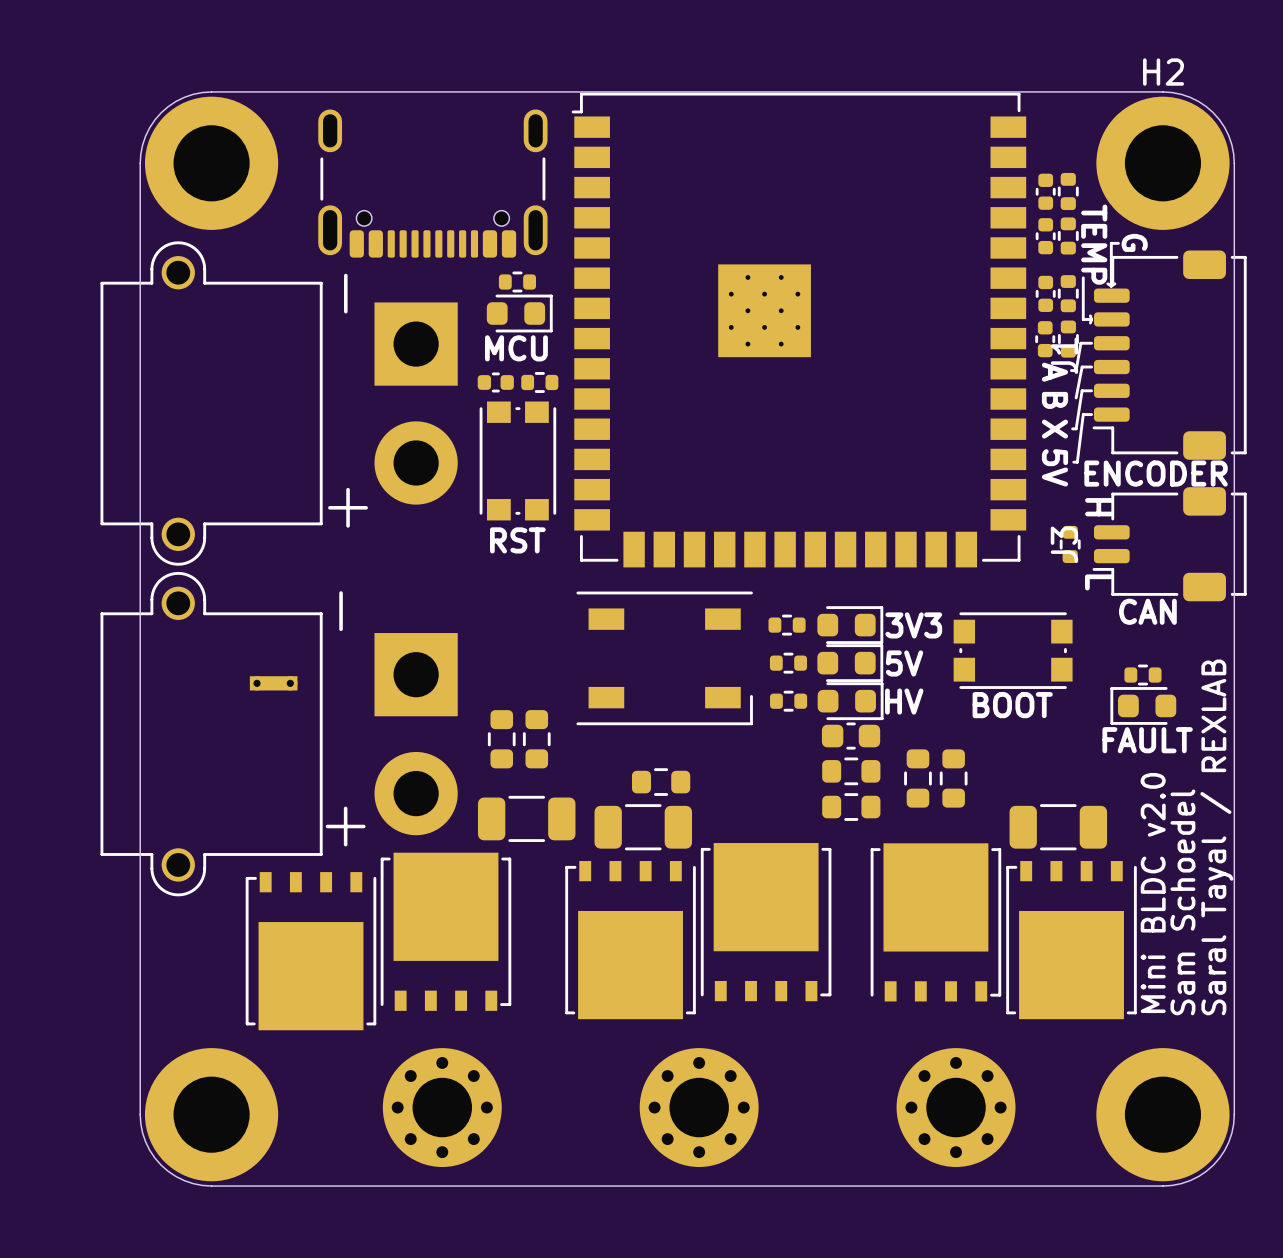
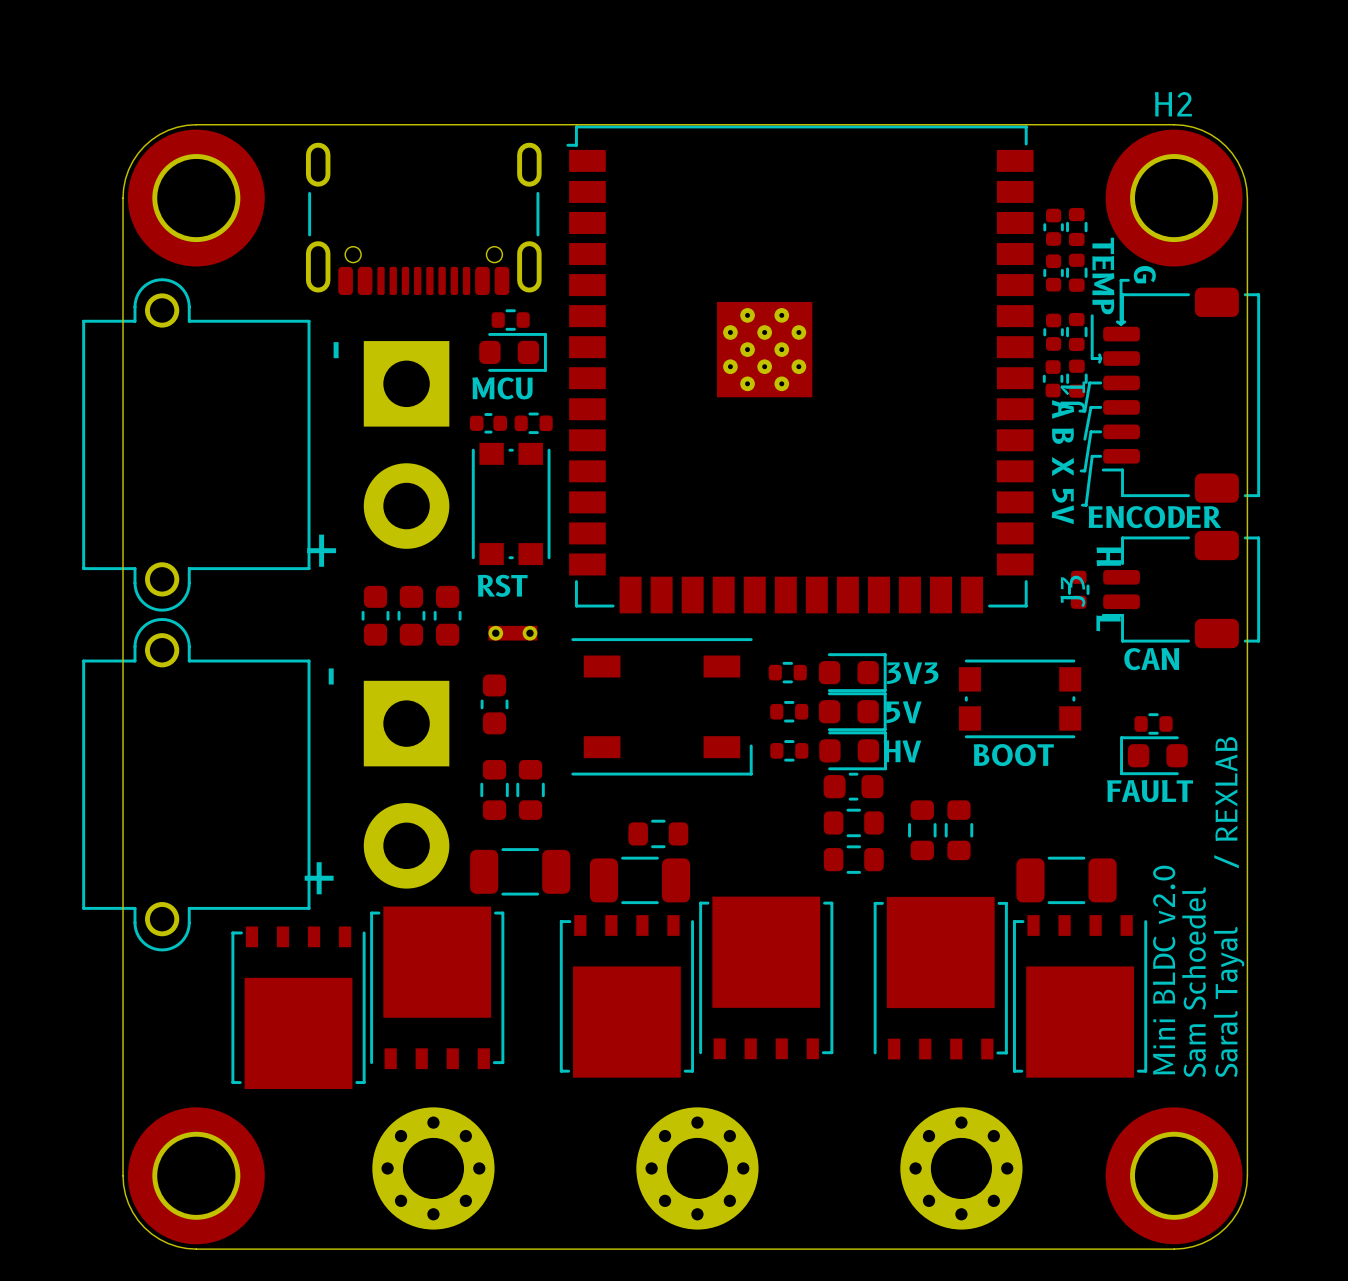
part: none -> (375, 615)
part: none -> (411, 615)
part: none -> (447, 615)
part: none -> (494, 704)
part position: (273, 683) -> (512, 633)

